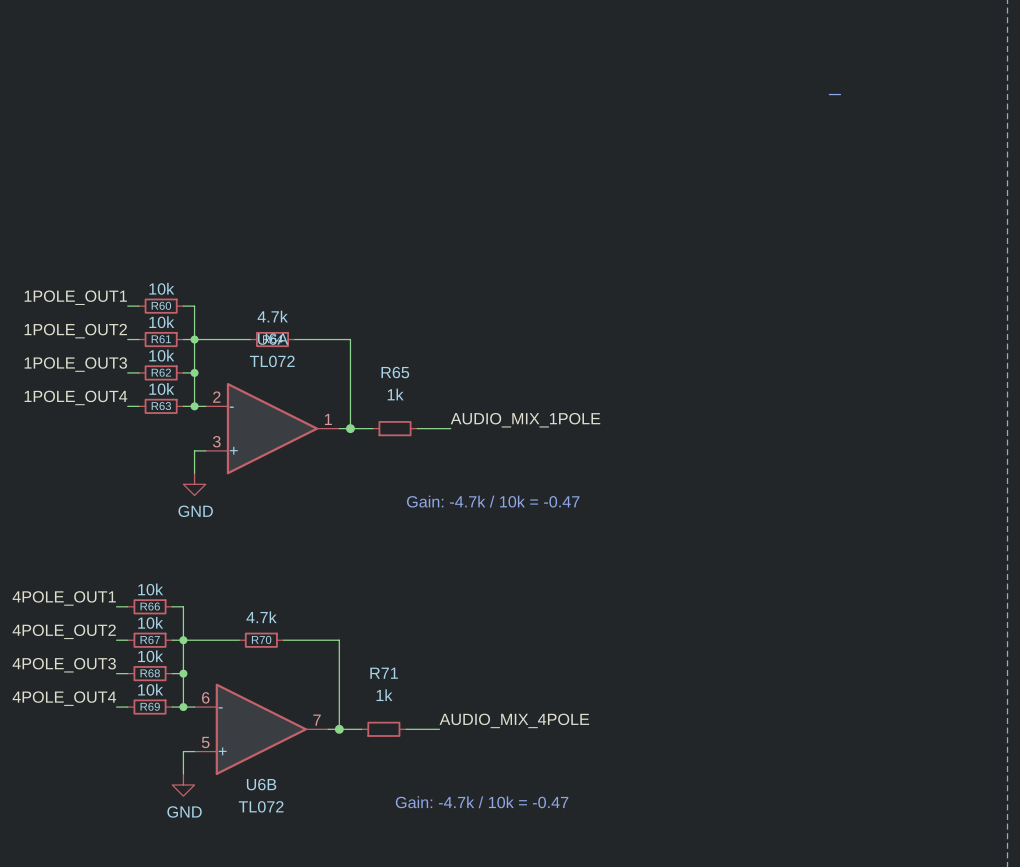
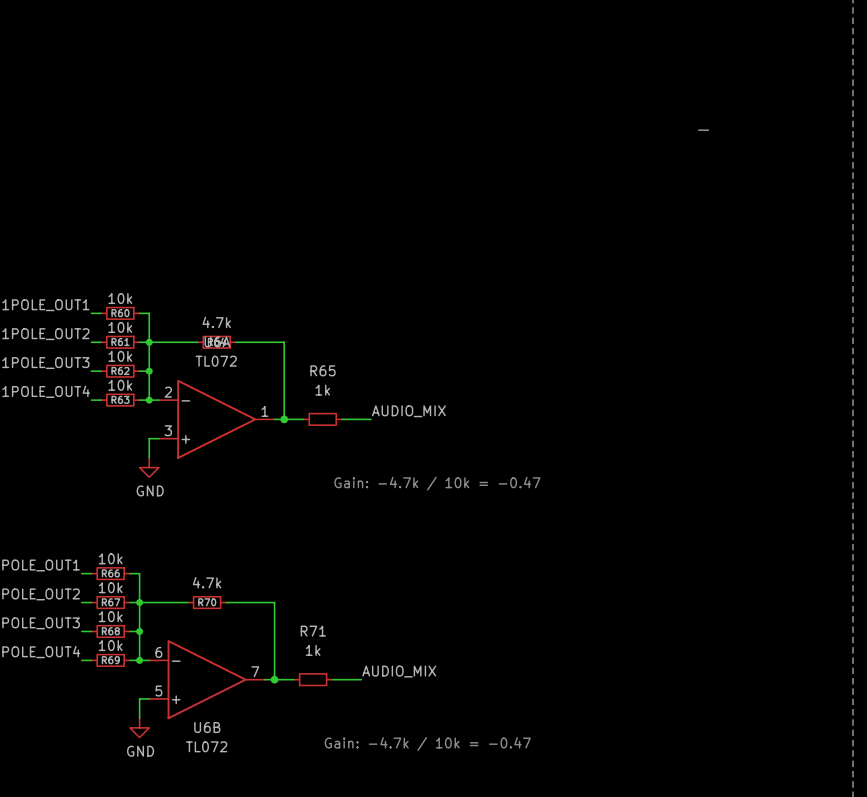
label: AUDIO_MIX_1POLE (525, 420) -> AUDIO_MIX (408, 411)
label: AUDIO_MIX_4POLE (514, 720) -> AUDIO_MIX (399, 671)

